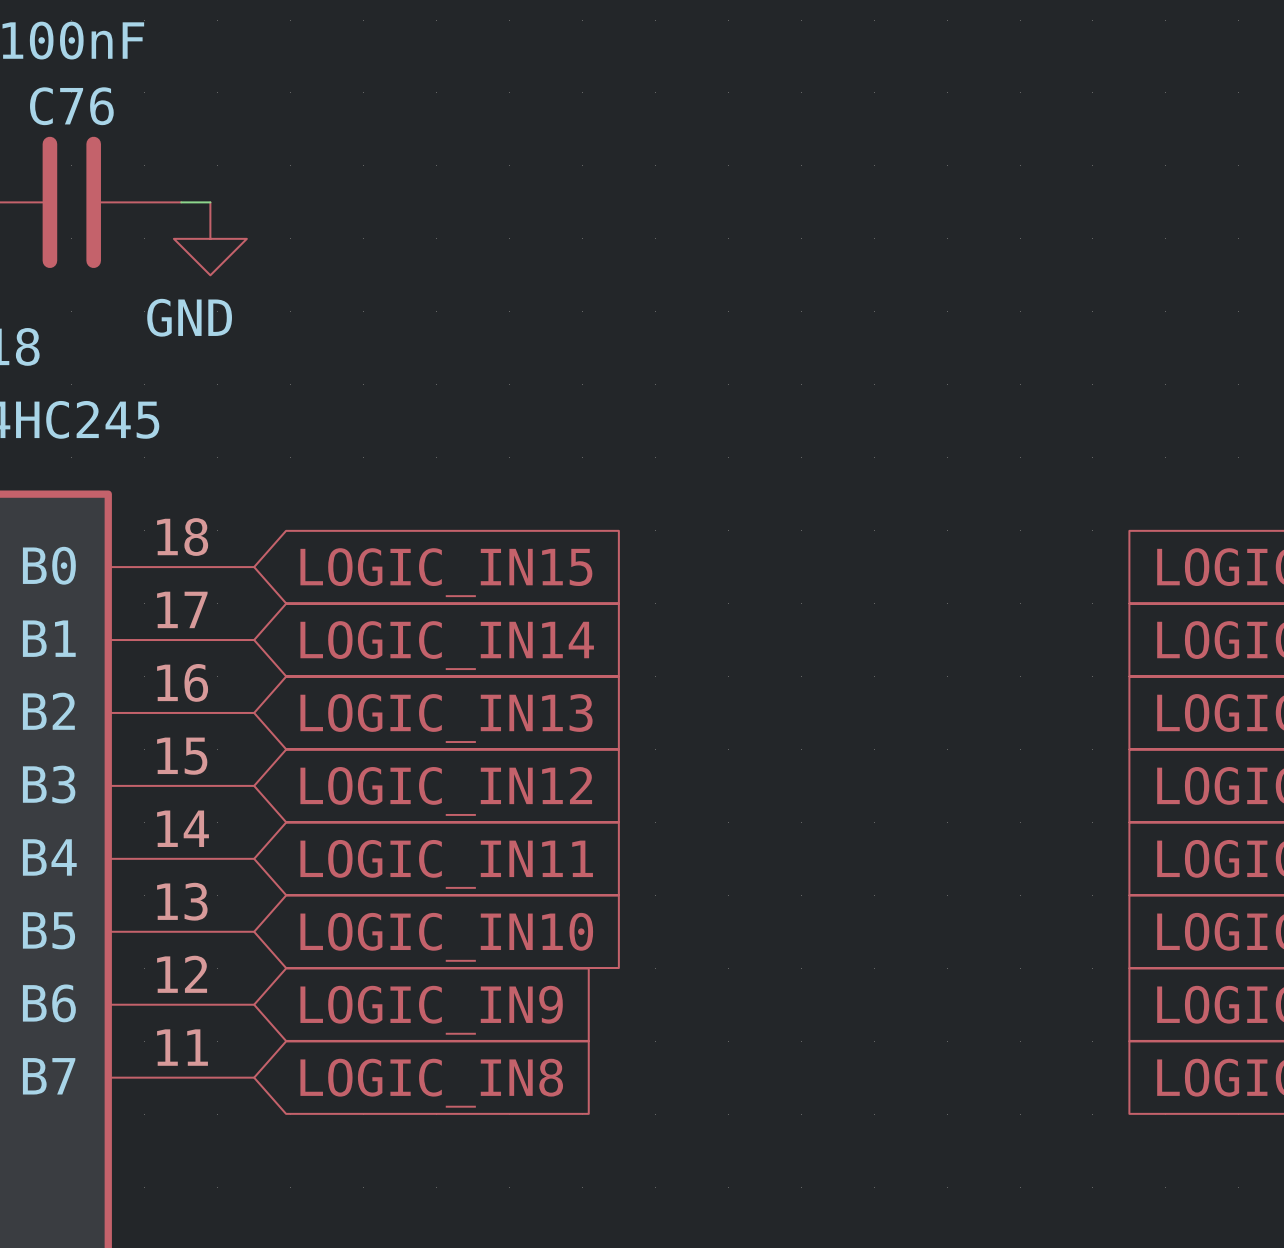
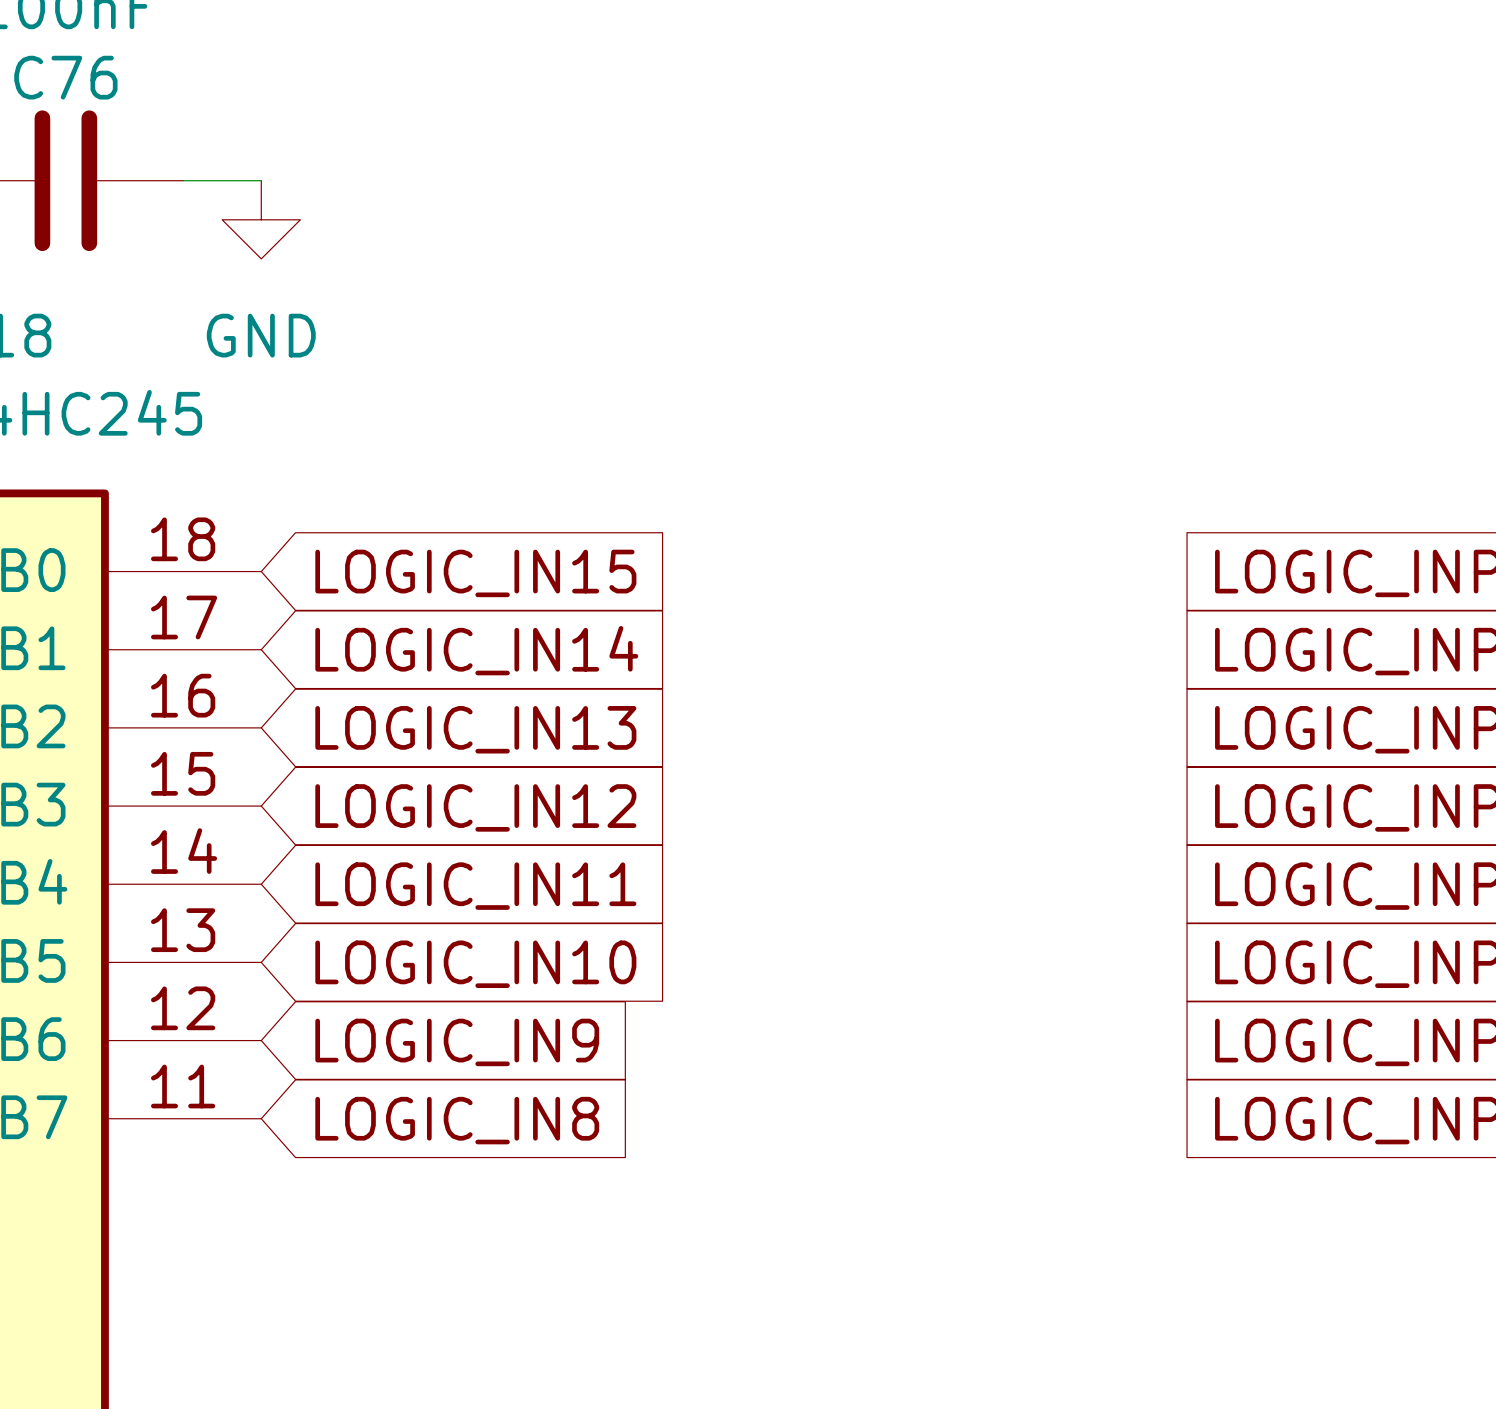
wire: none -> (214, 180) (261, 180)
power symbol position: GND (210, 238) -> GND (261, 219)
power symbol text position: GND (189, 317) -> GND (261, 335)

